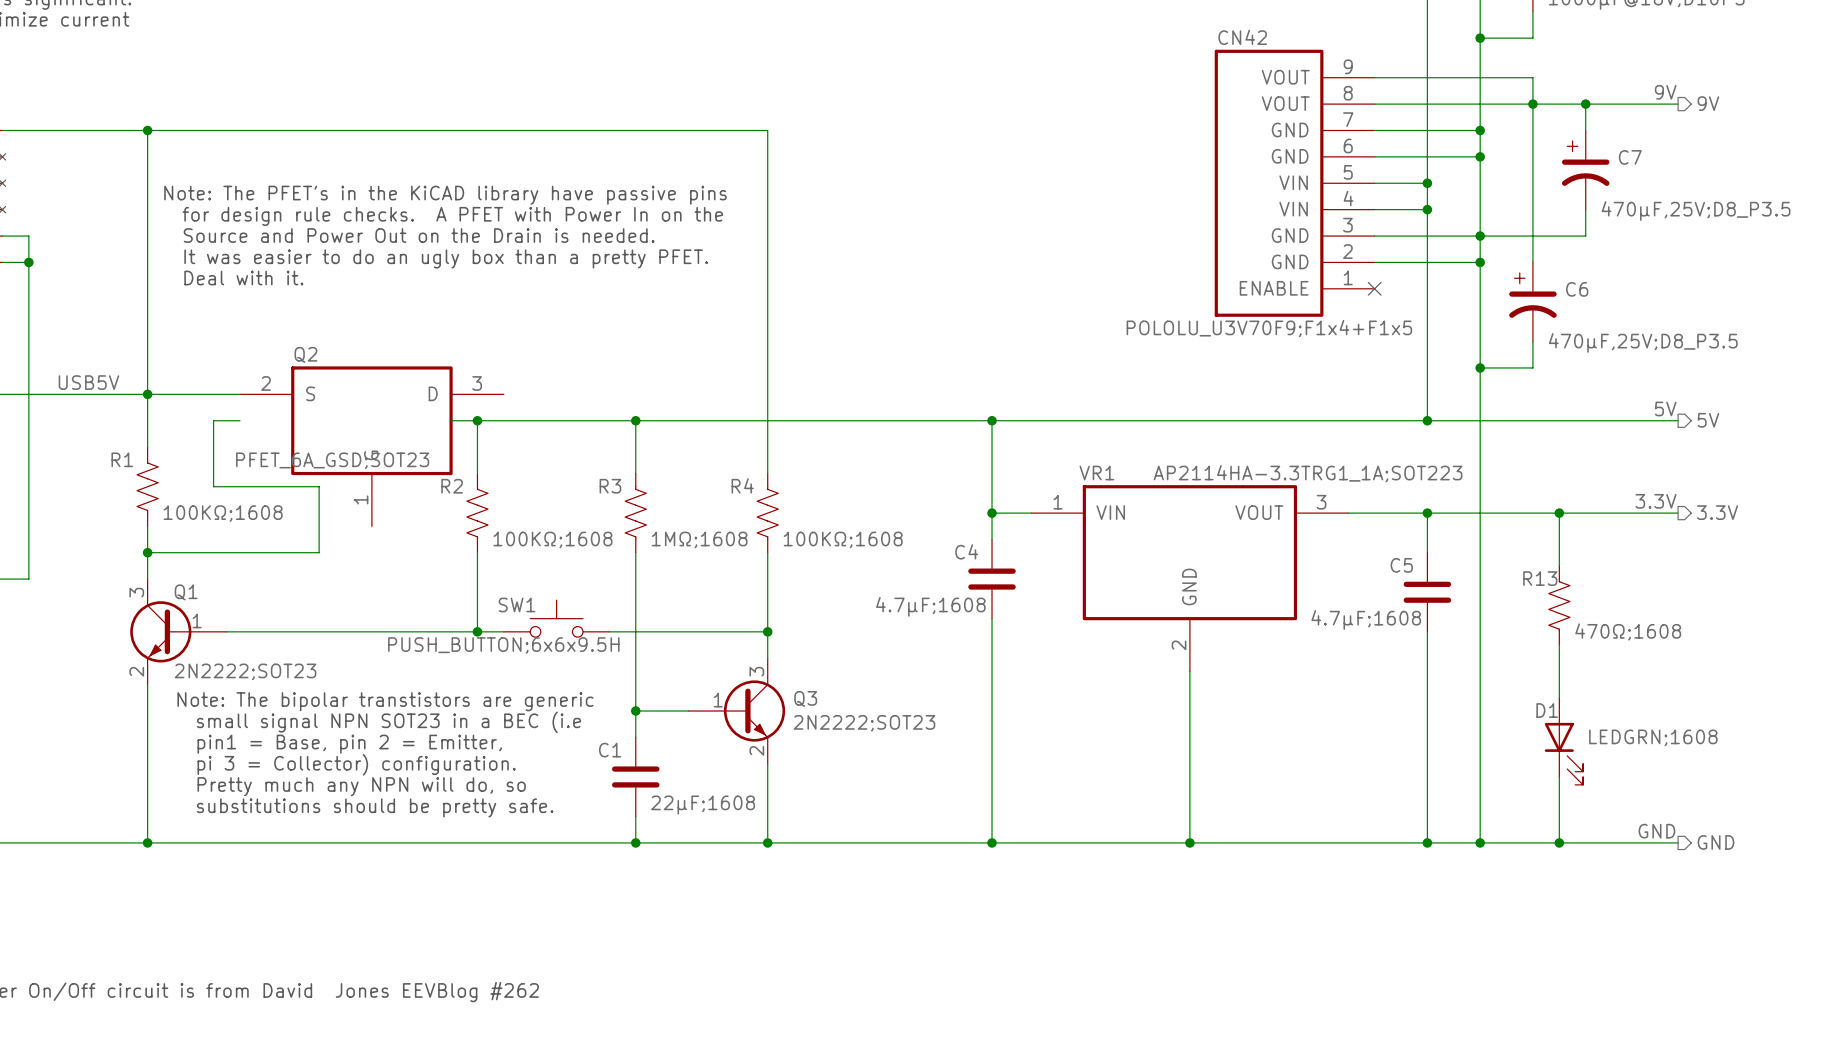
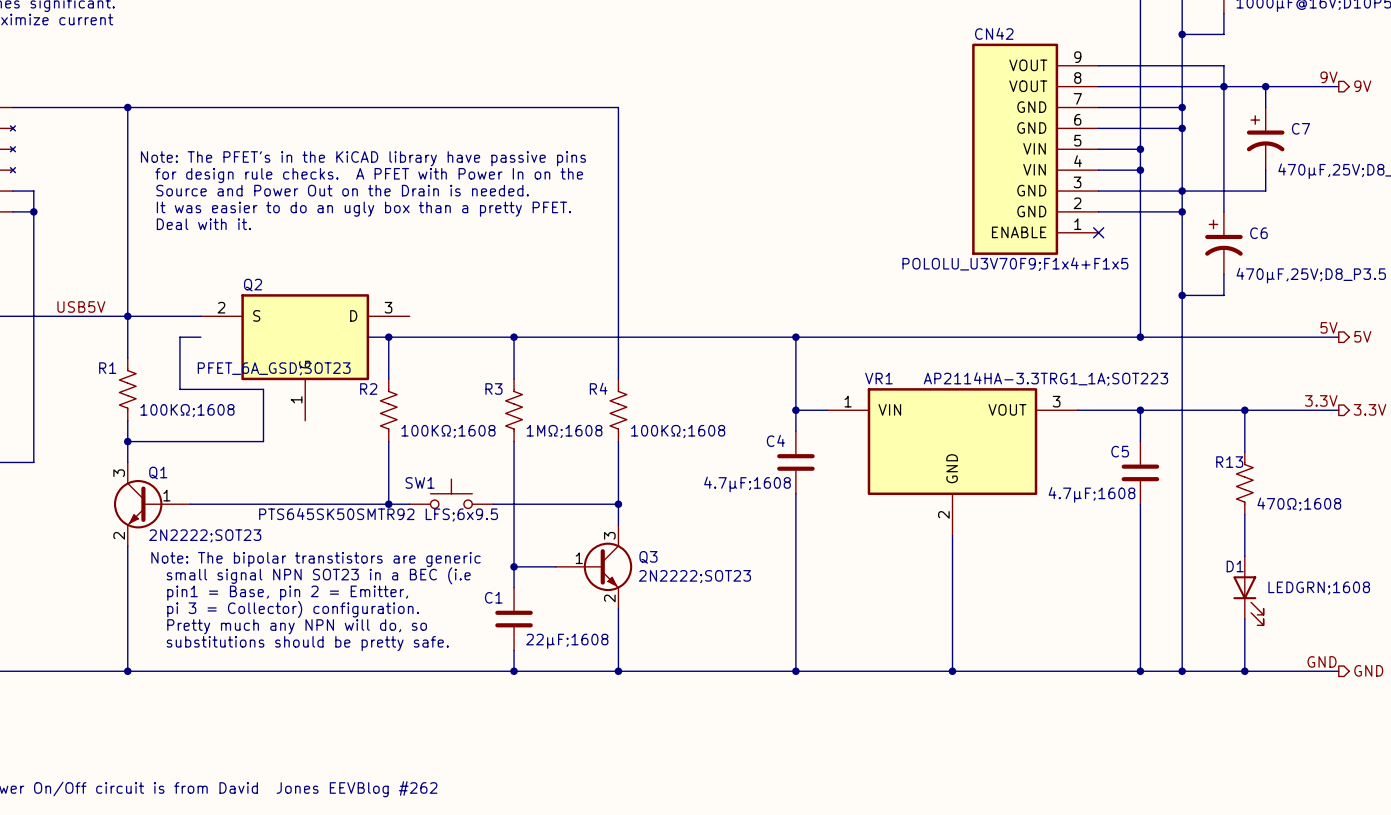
SW1 value: PUSH_BUTTON;6x6x9.5H (503, 645) -> PTS645SK50SMTR92 LFS;6x9.5 (378, 514)

